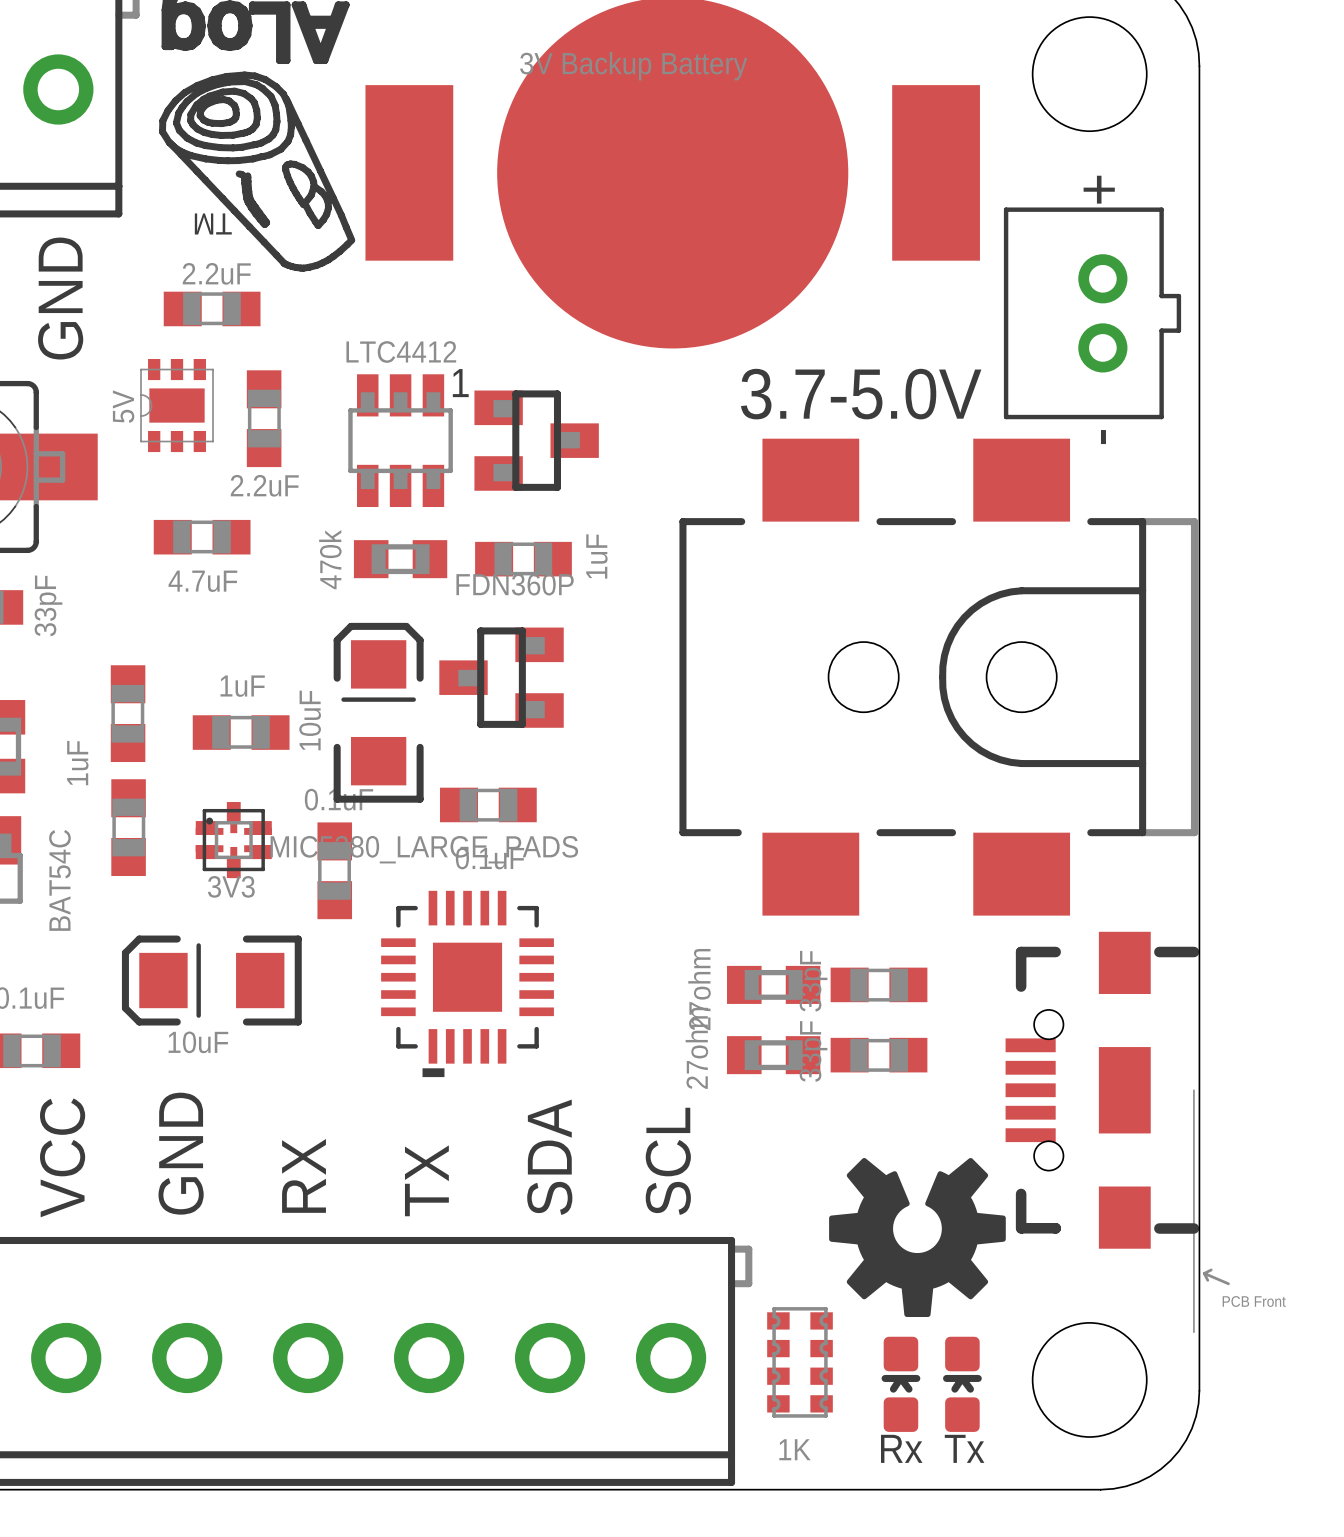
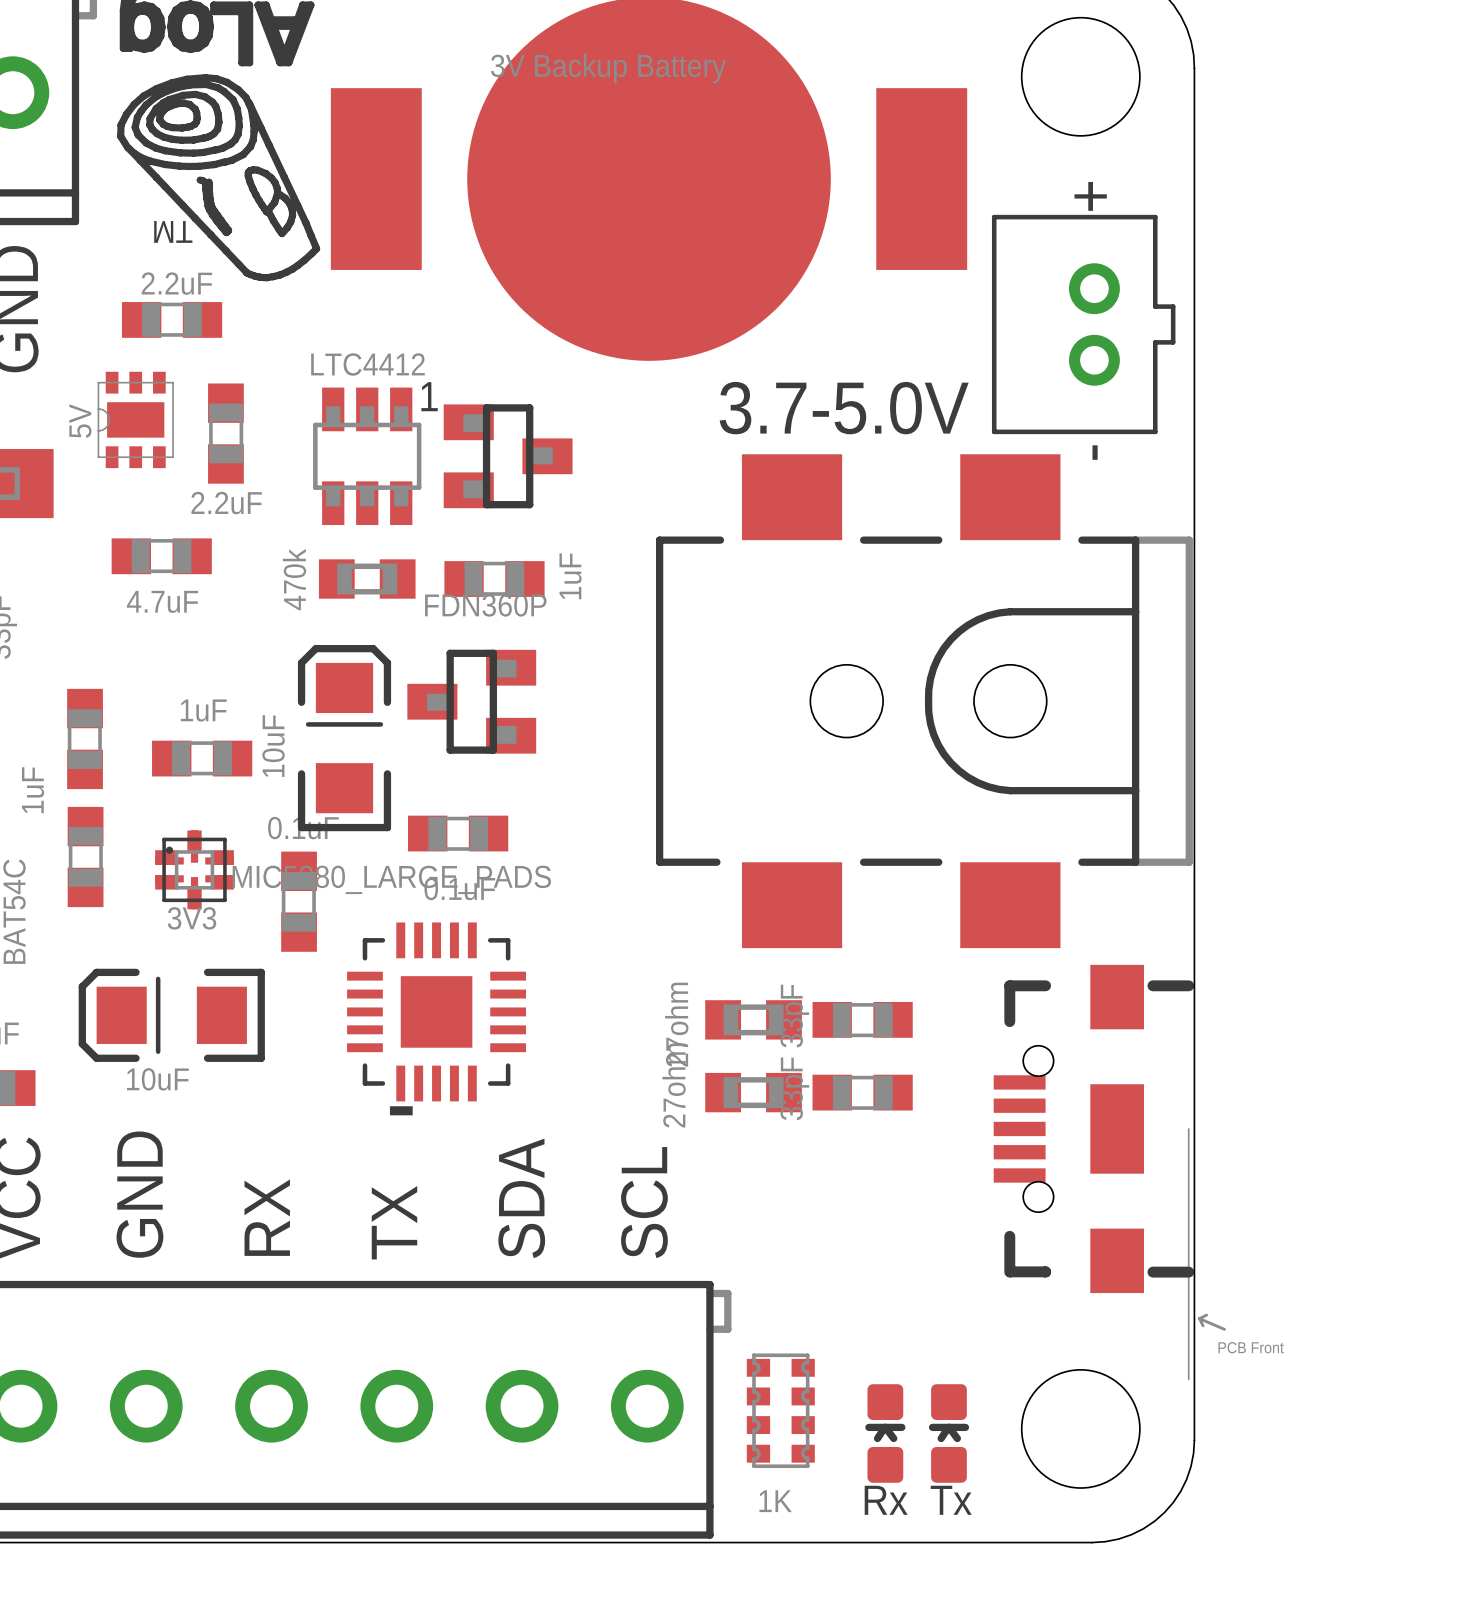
drawing: [829, 1157, 1006, 1318] -> none

